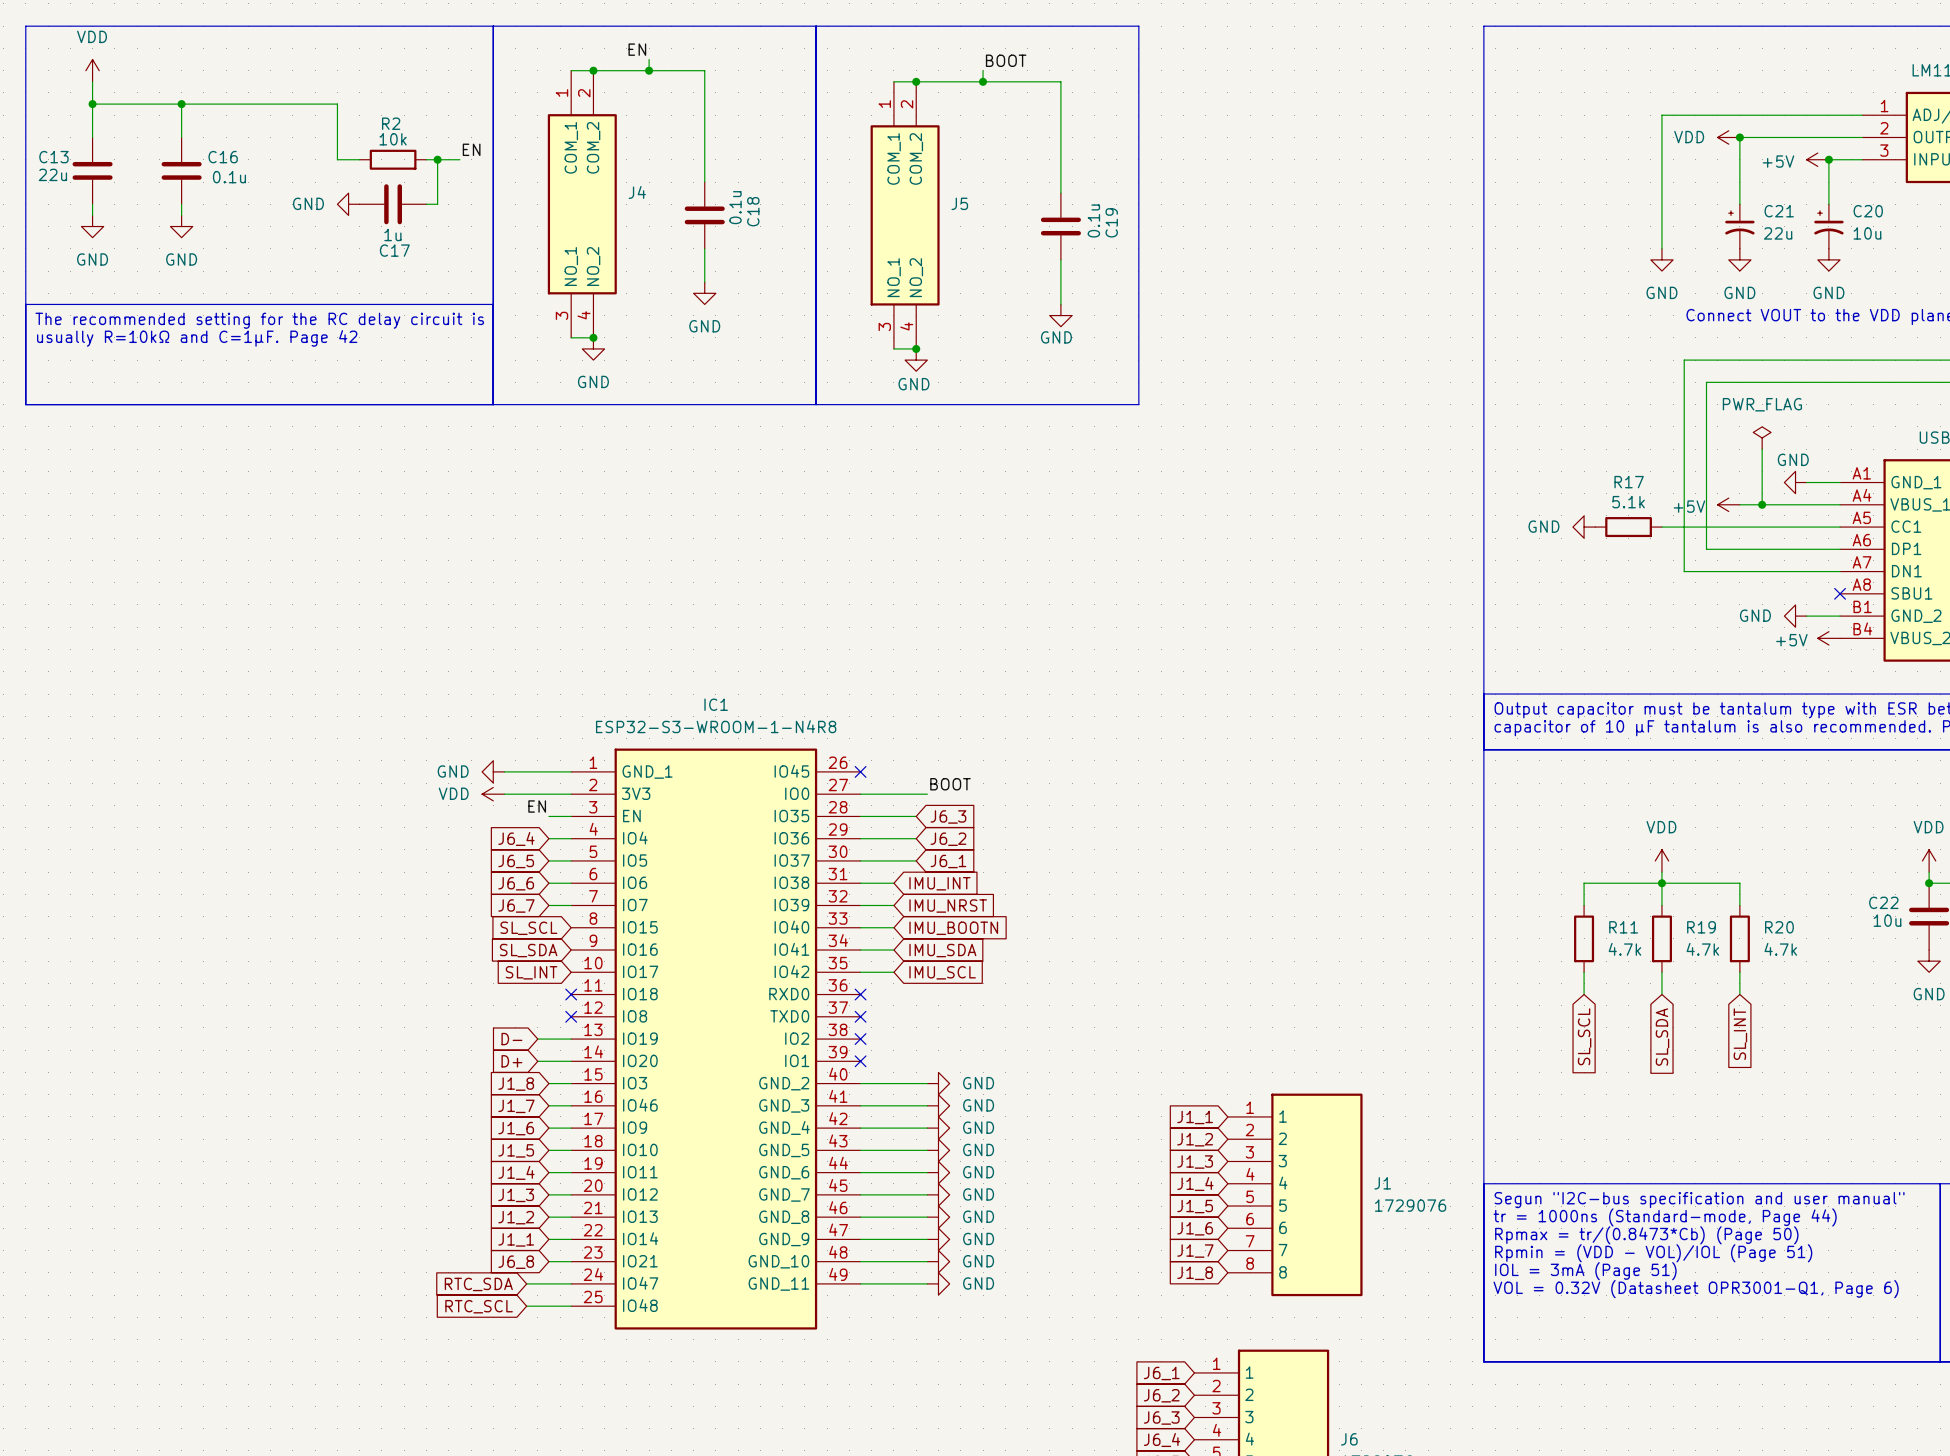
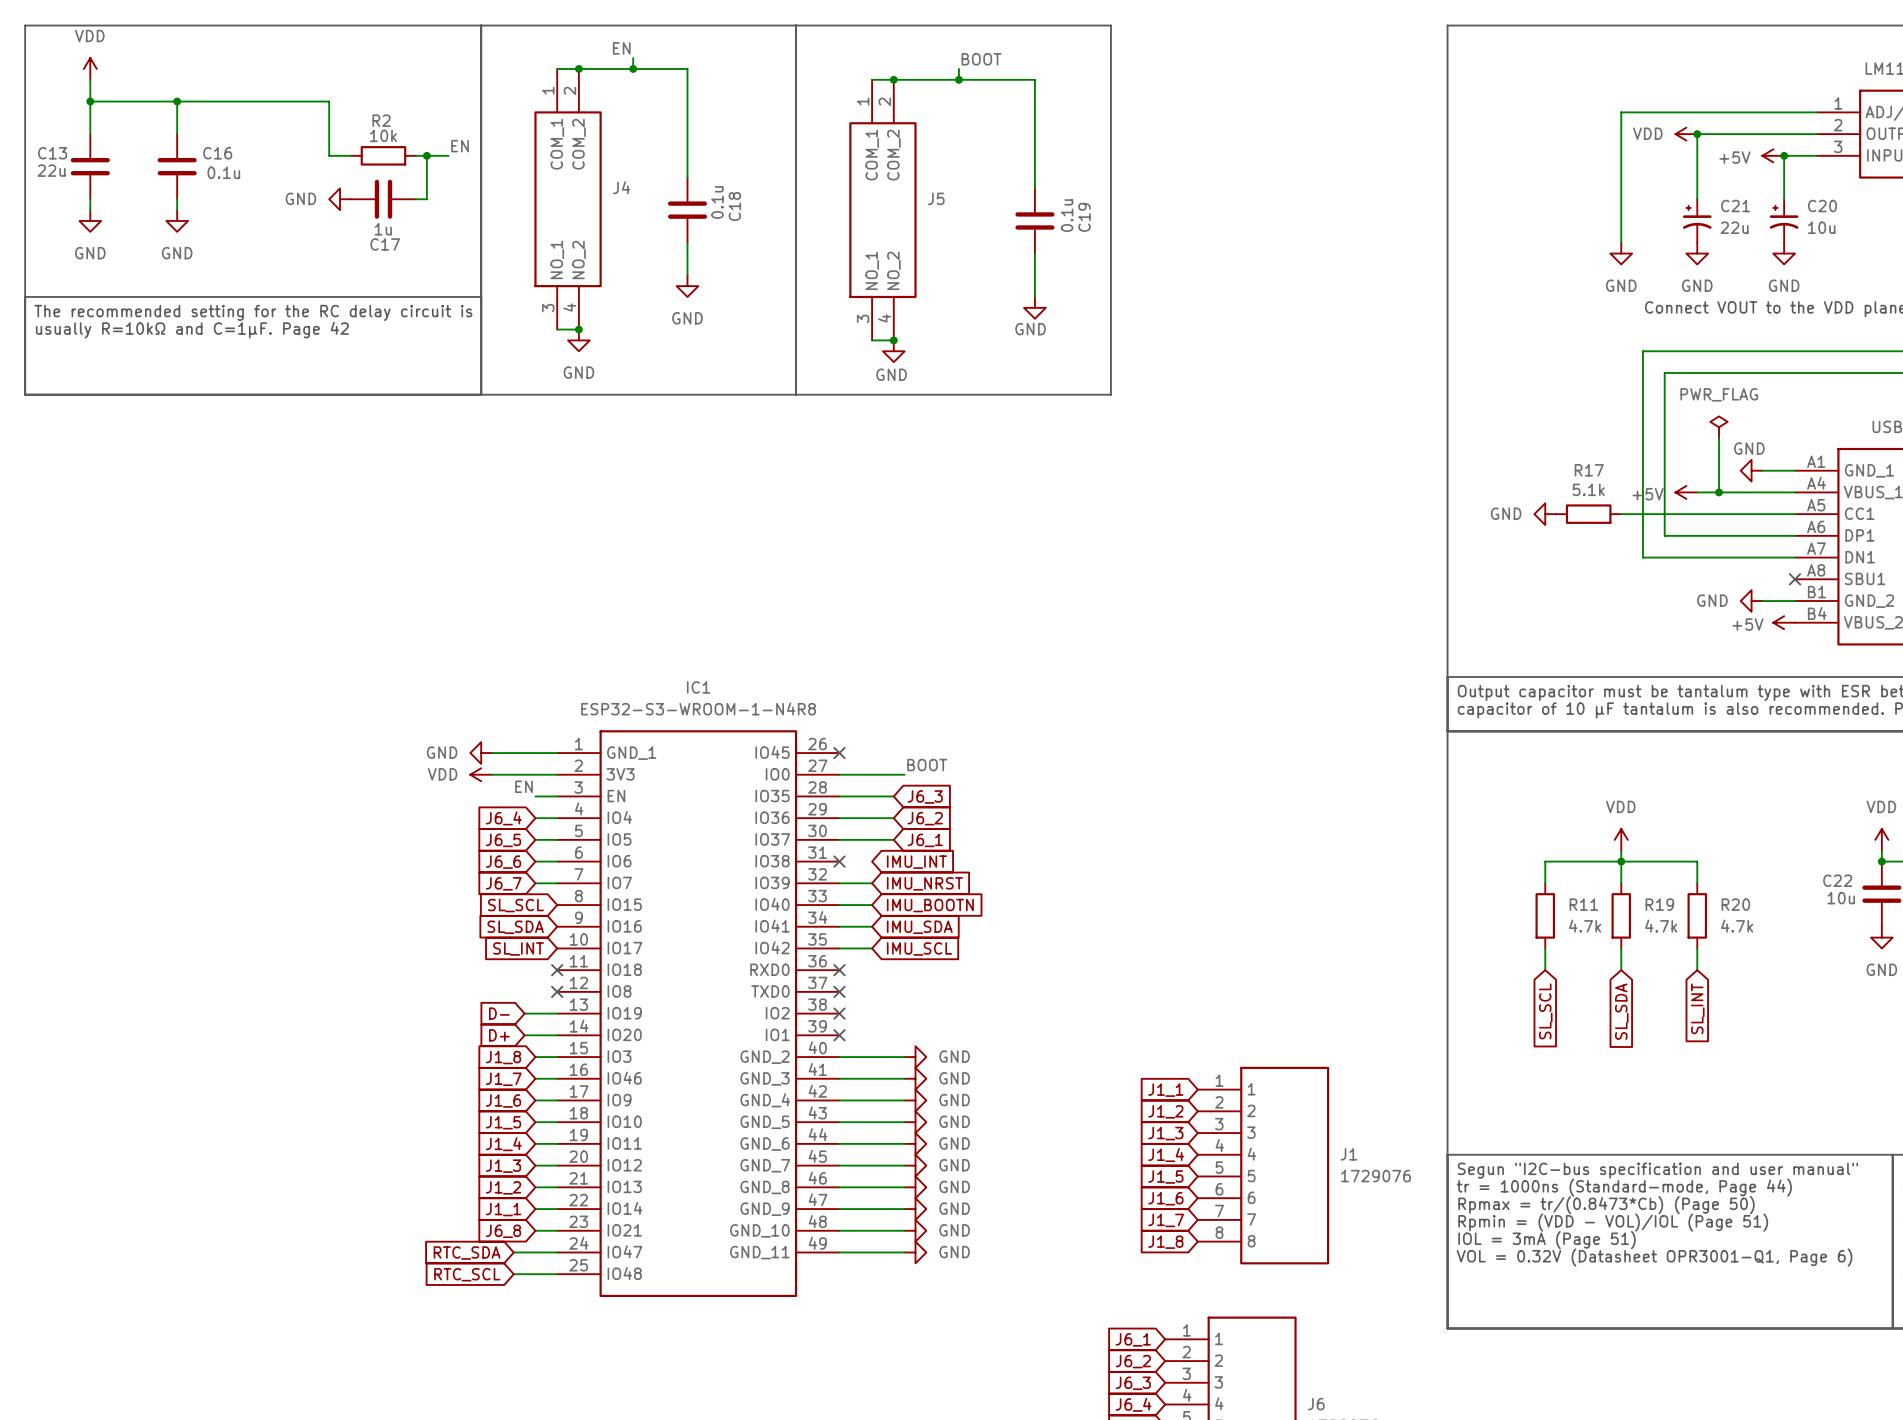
wire: (860, 883) (893, 883) -> none
no-connect mark: none -> (839, 861)

